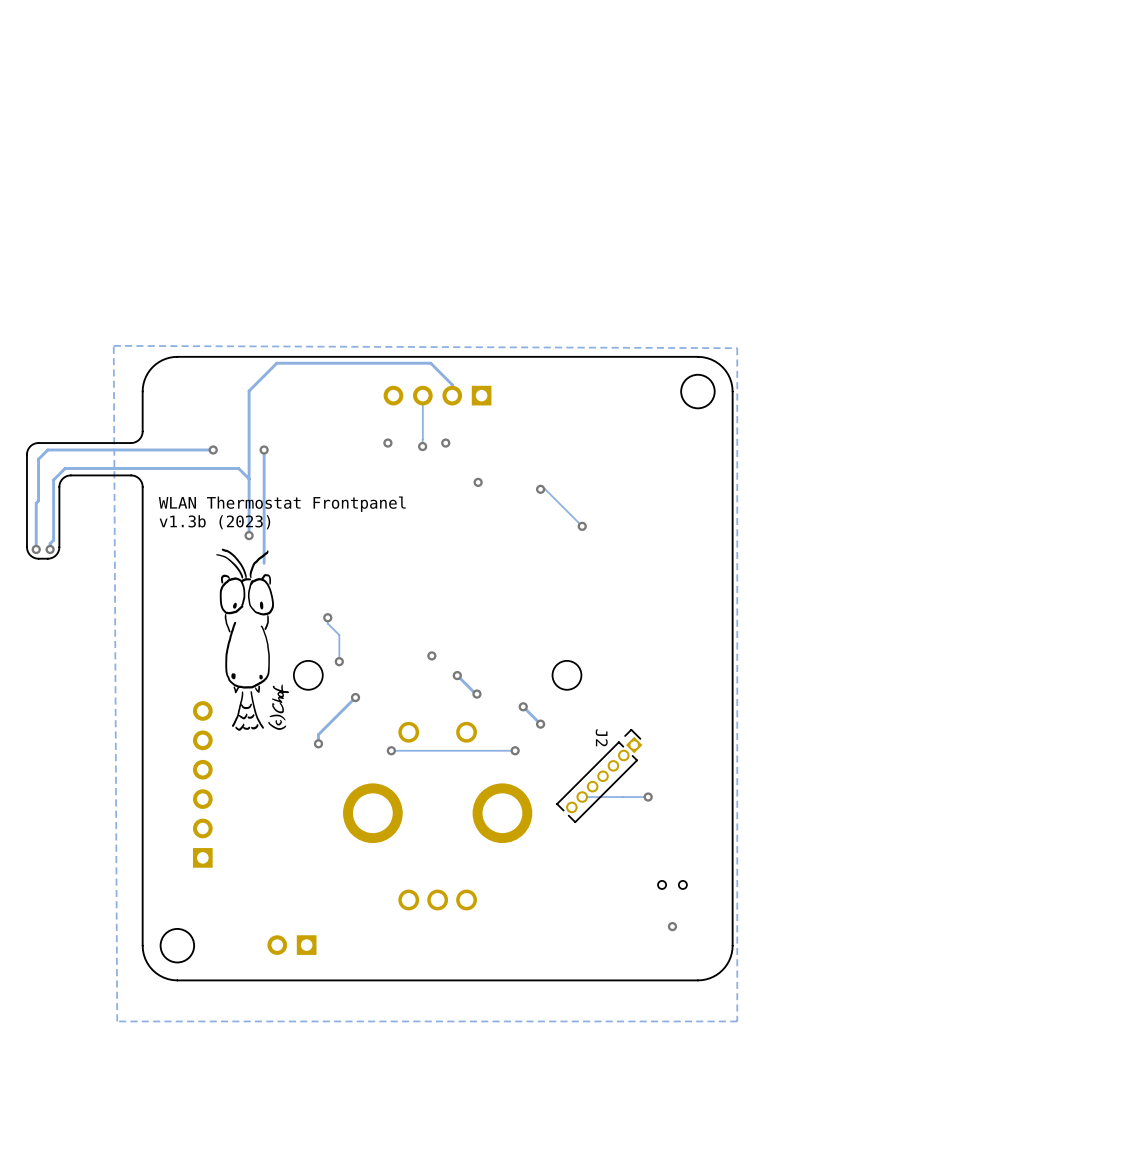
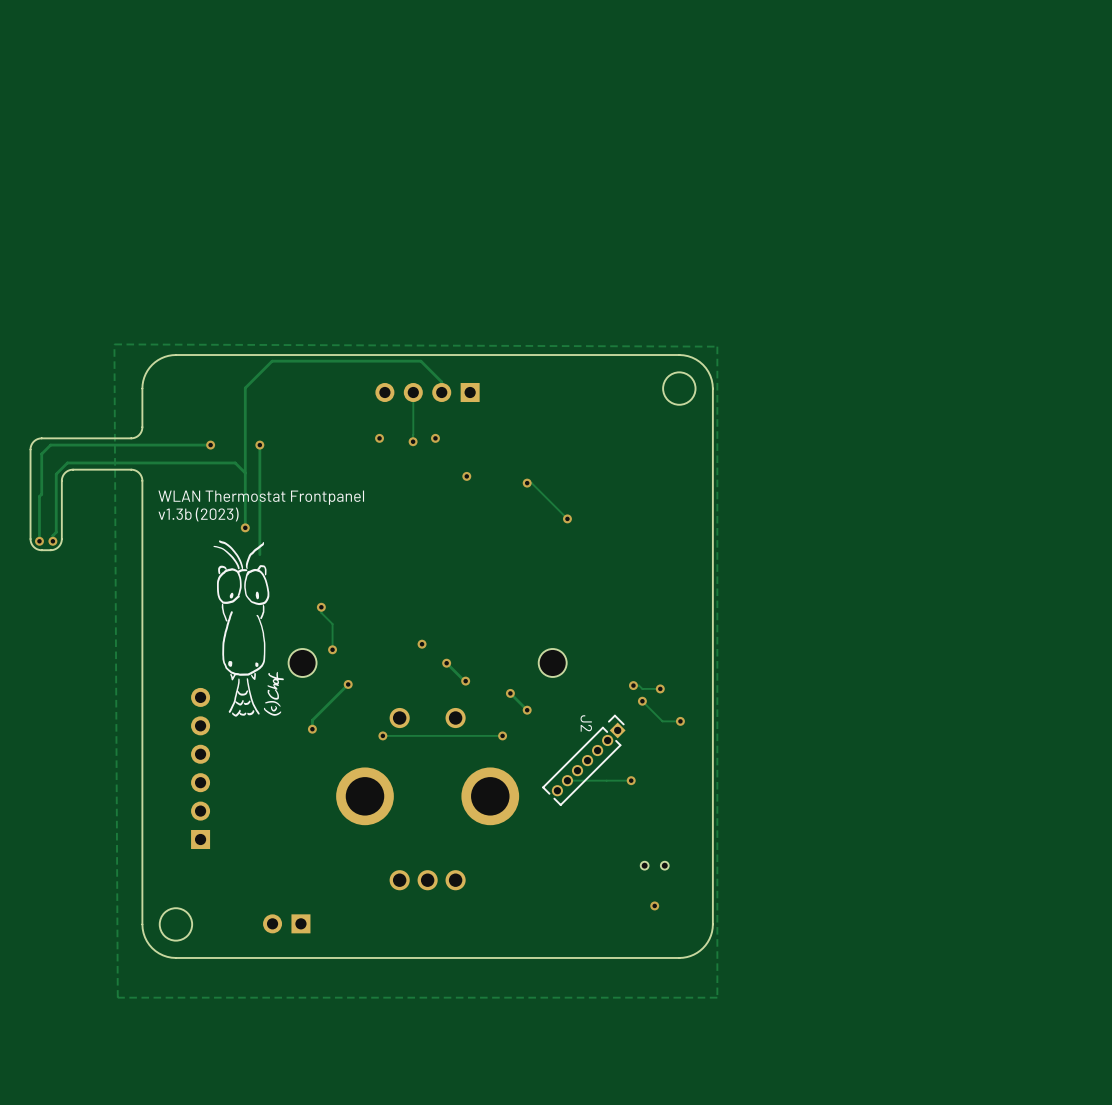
track: none -> (633, 685) (639, 685) (642, 688) (660, 688)
via: none -> (633, 685)
via: none -> (660, 688)
track: none -> (642, 701) (662, 721) (680, 721)
via: none -> (642, 701)
via: none -> (680, 721)

